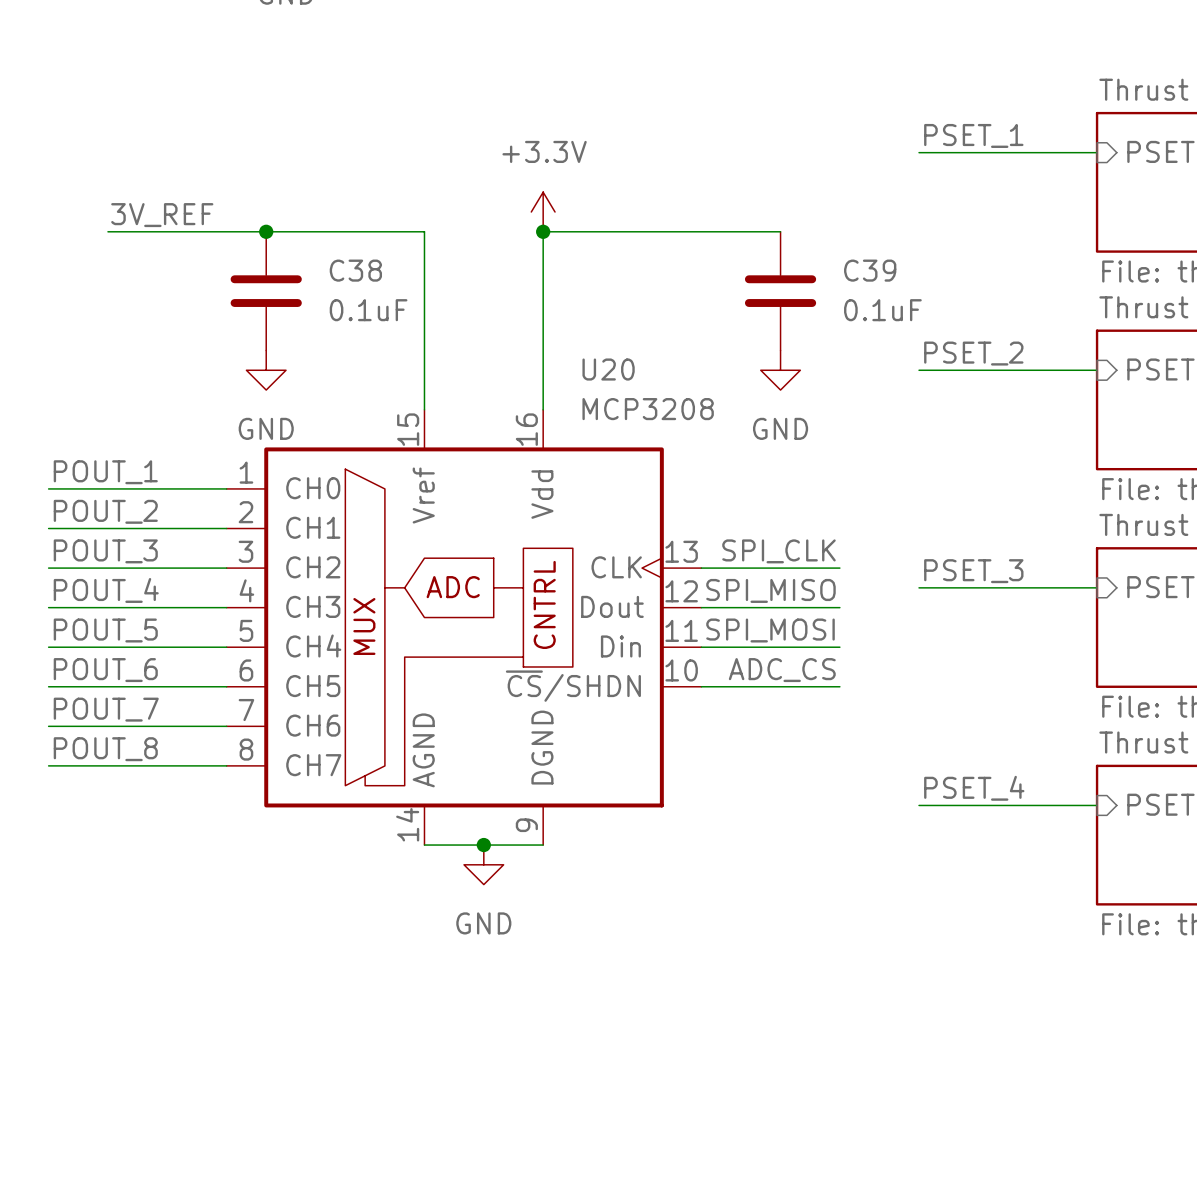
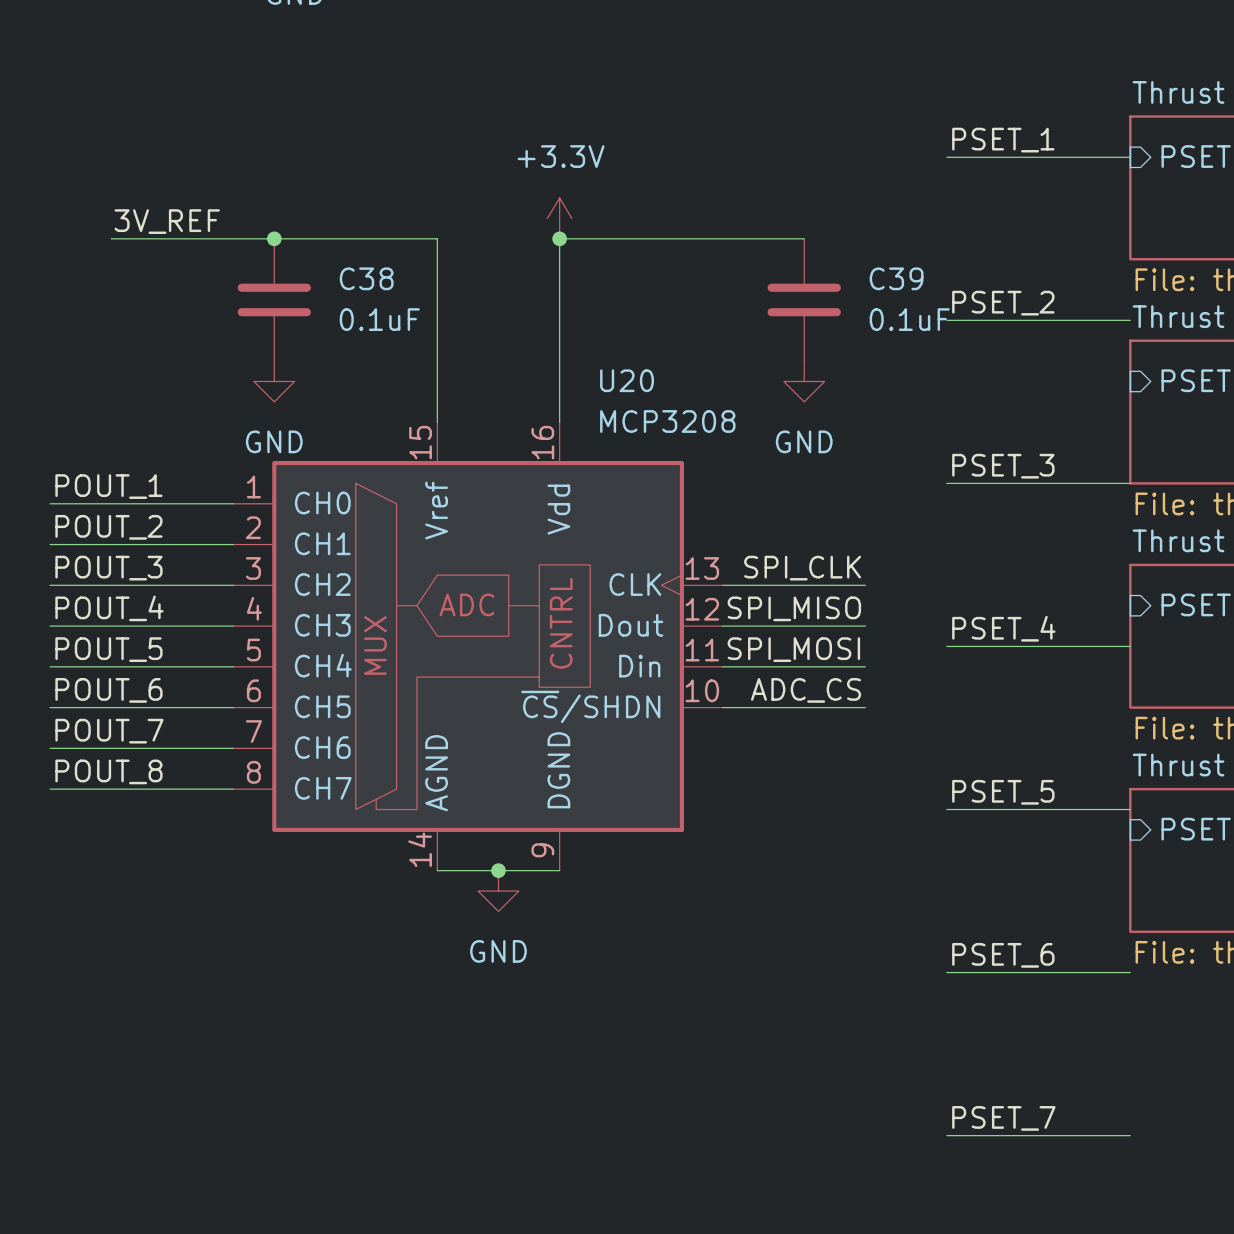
wire: none -> (946, 320) (1130, 320)
label position: PSET_2 (973, 353) -> PSET_2 (1003, 303)
wire: (919, 370) (1097, 370) -> (946, 483) (1130, 483)
label position: PSET_3 (973, 571) -> PSET_3 (1003, 466)
wire: (919, 587) (1097, 587) -> (946, 646) (1130, 646)
label: none -> PSET_5 (1003, 792)
label position: PSET_4 (974, 788) -> PSET_4 (1003, 628)
wire: (919, 805) (1097, 805) -> (946, 809) (1130, 809)
label: none -> PSET_6 (1003, 955)
wire: none -> (946, 972) (1130, 972)
label: none -> PSET_7 (1003, 1118)
wire: none -> (946, 1135) (1130, 1135)

